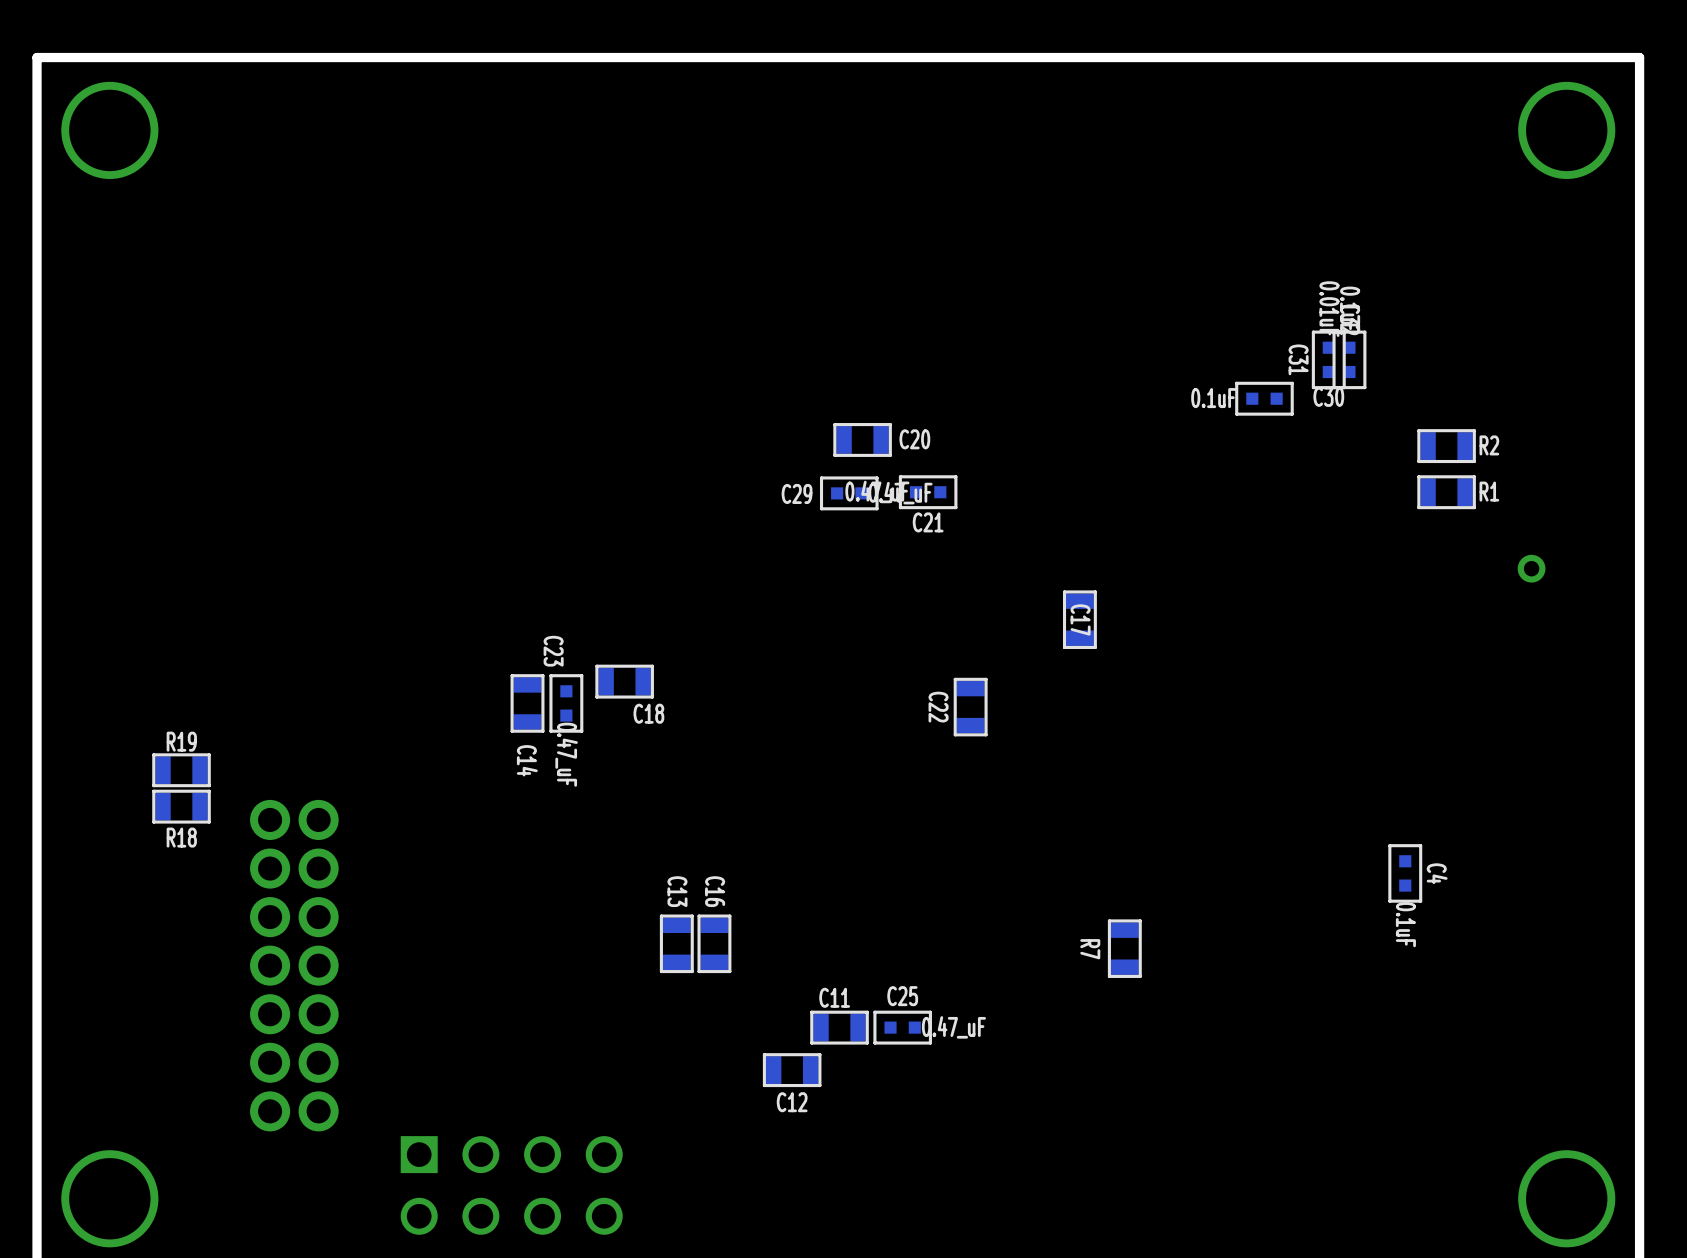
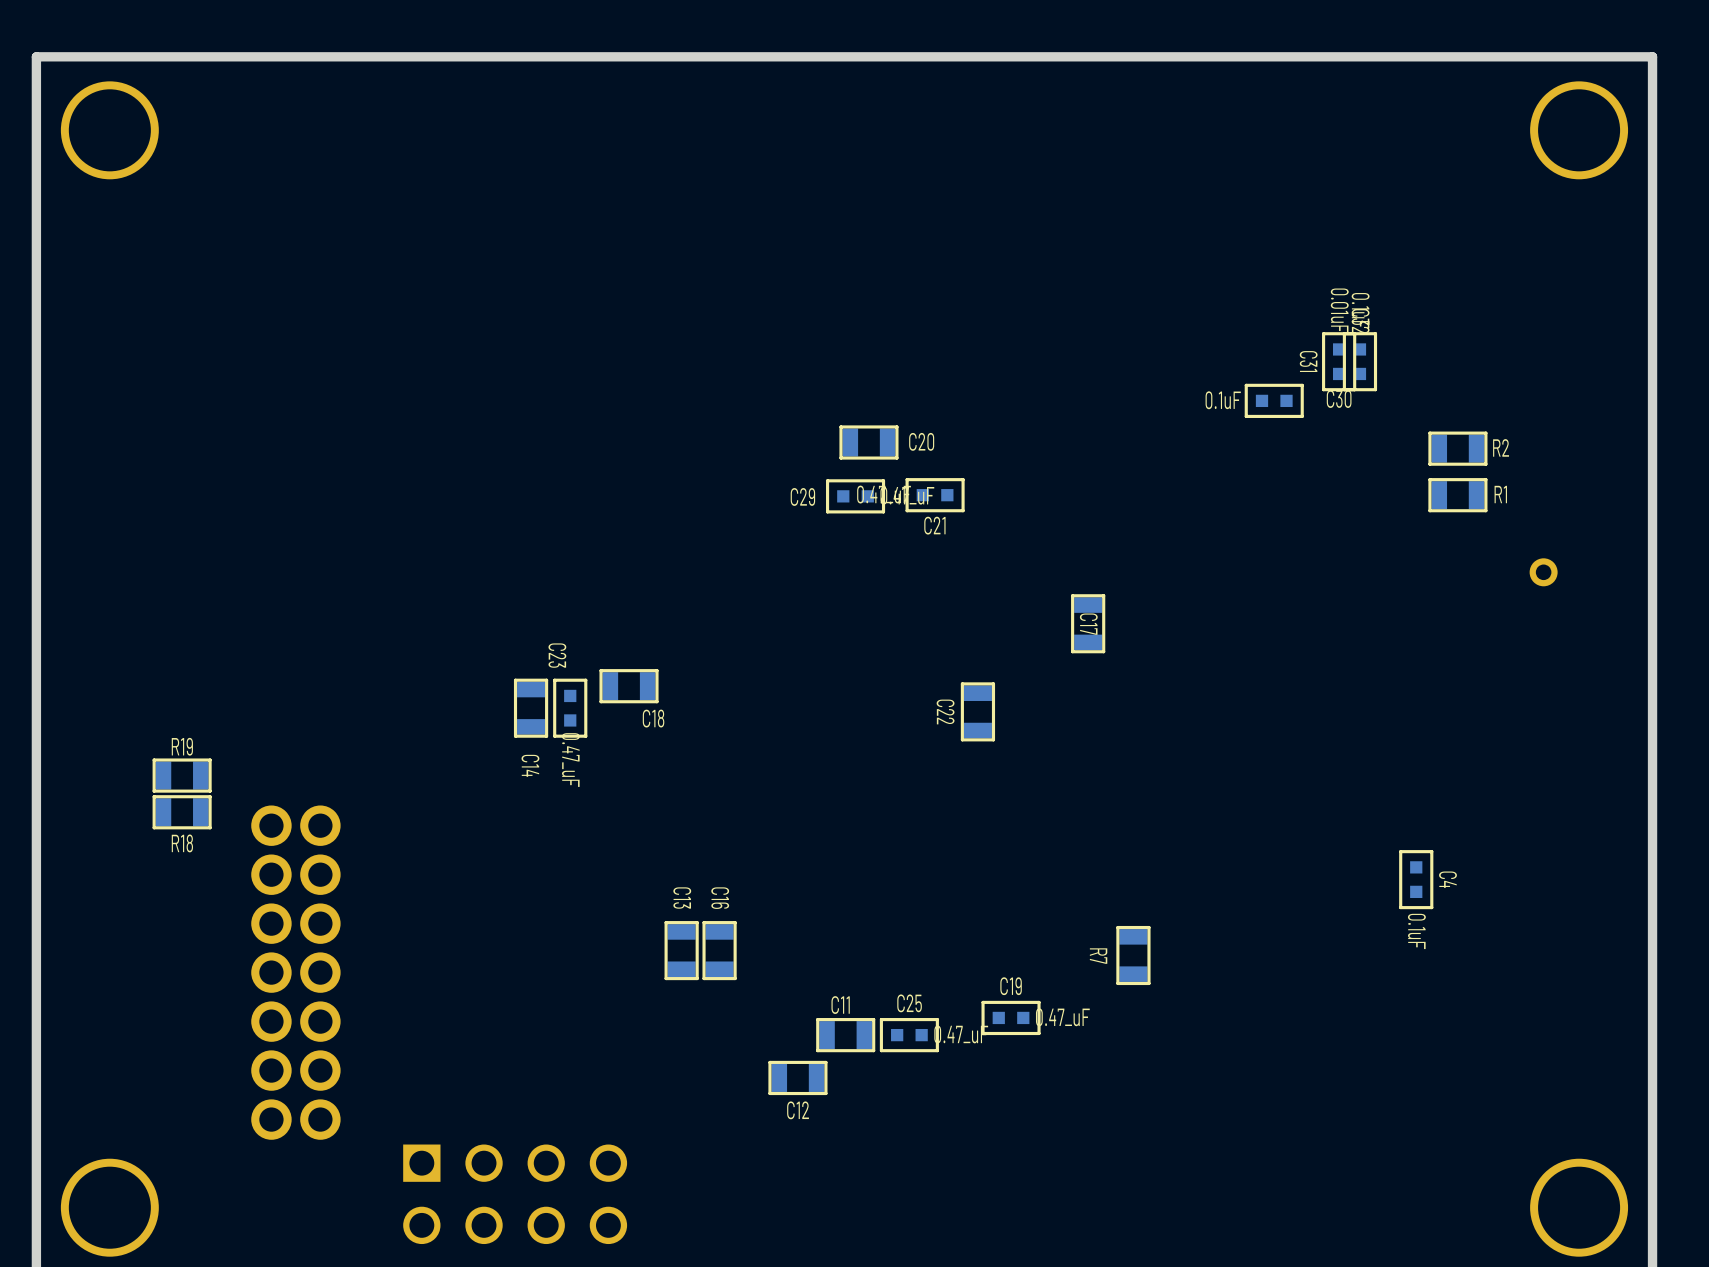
C19: none -> 0.47_uF (1011, 1017)

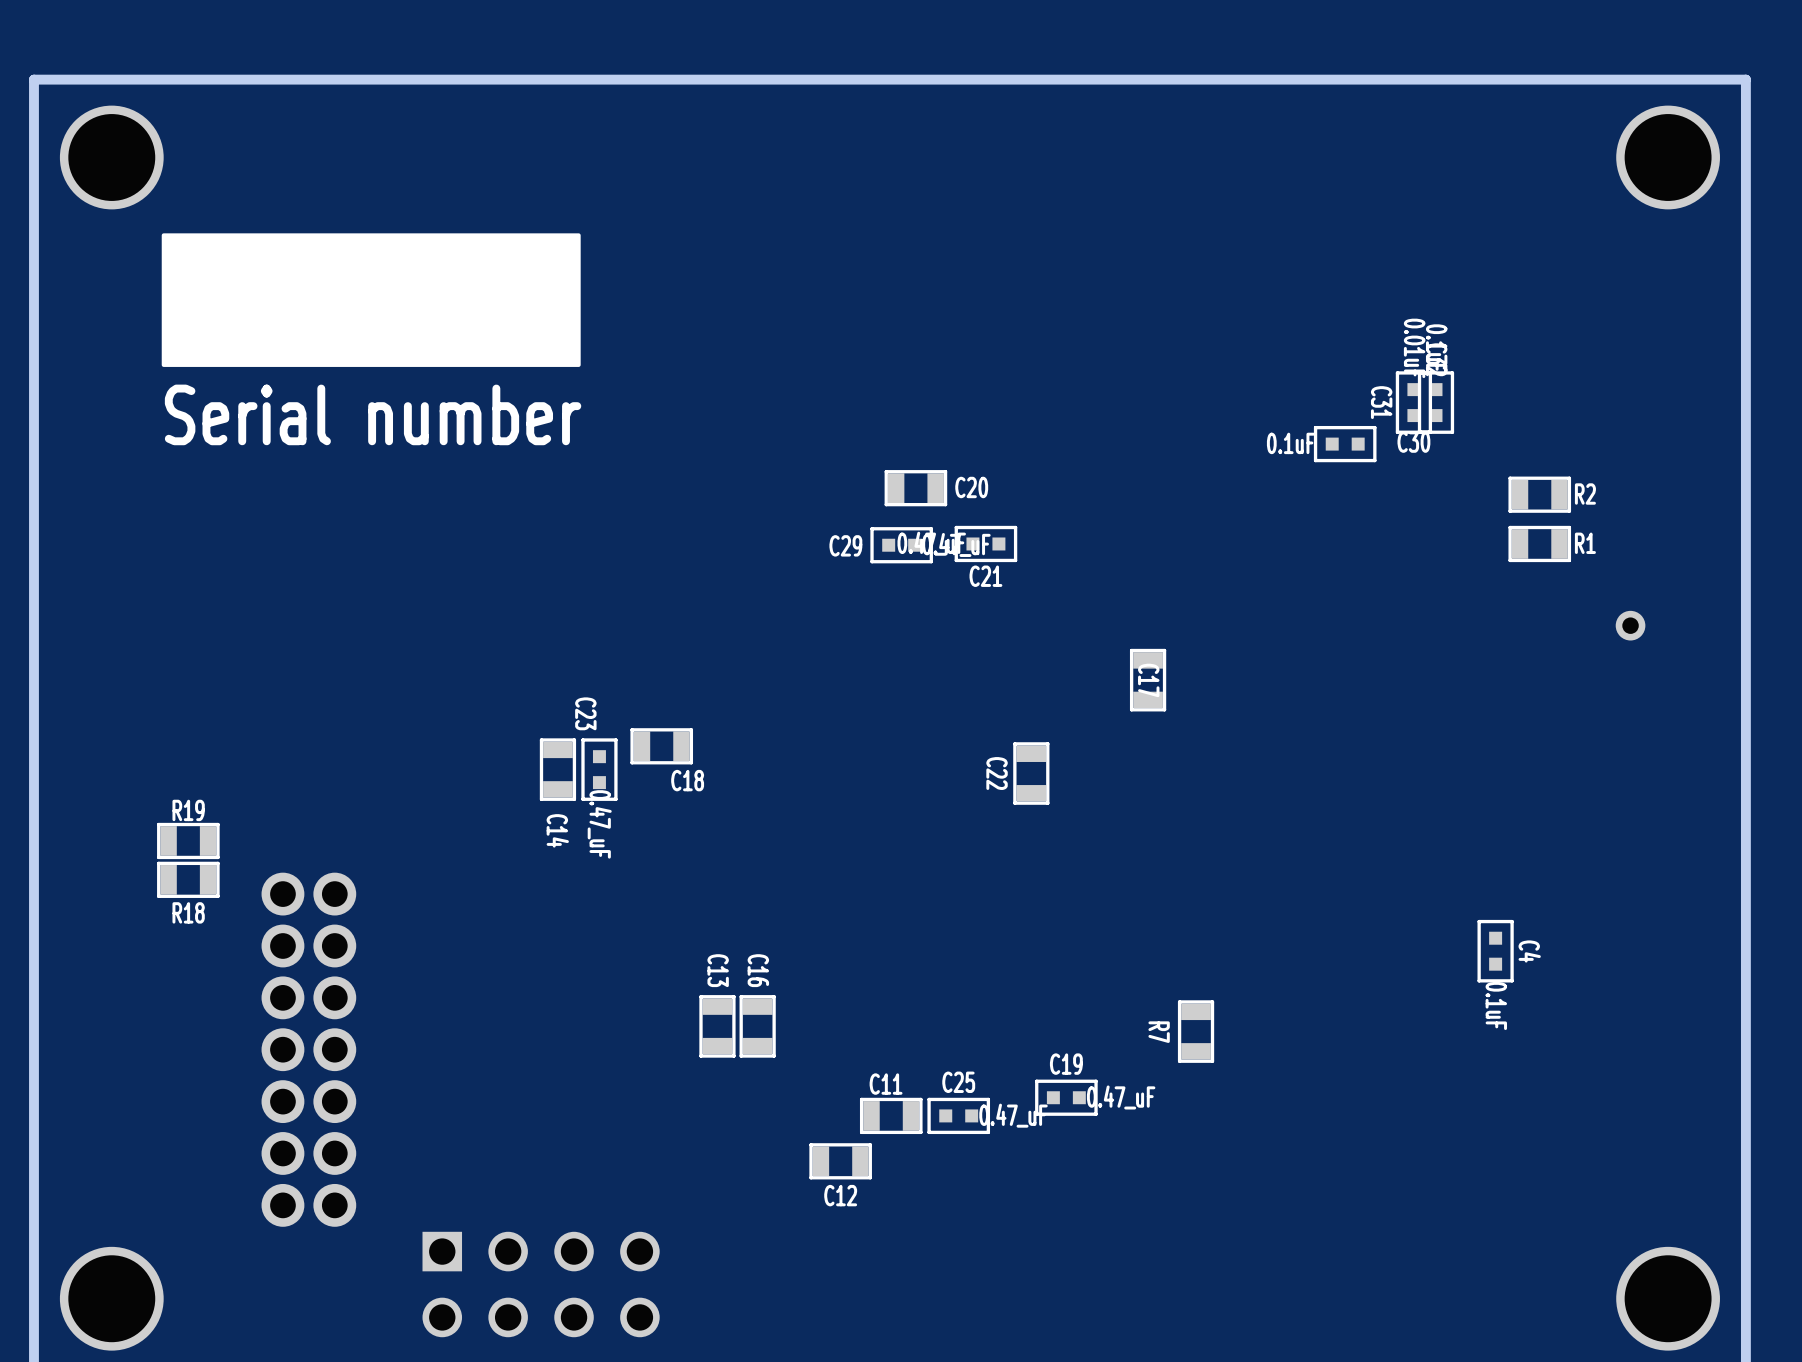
drawing: none -> [161, 233, 581, 367]
text: none -> Serial number (373, 414)

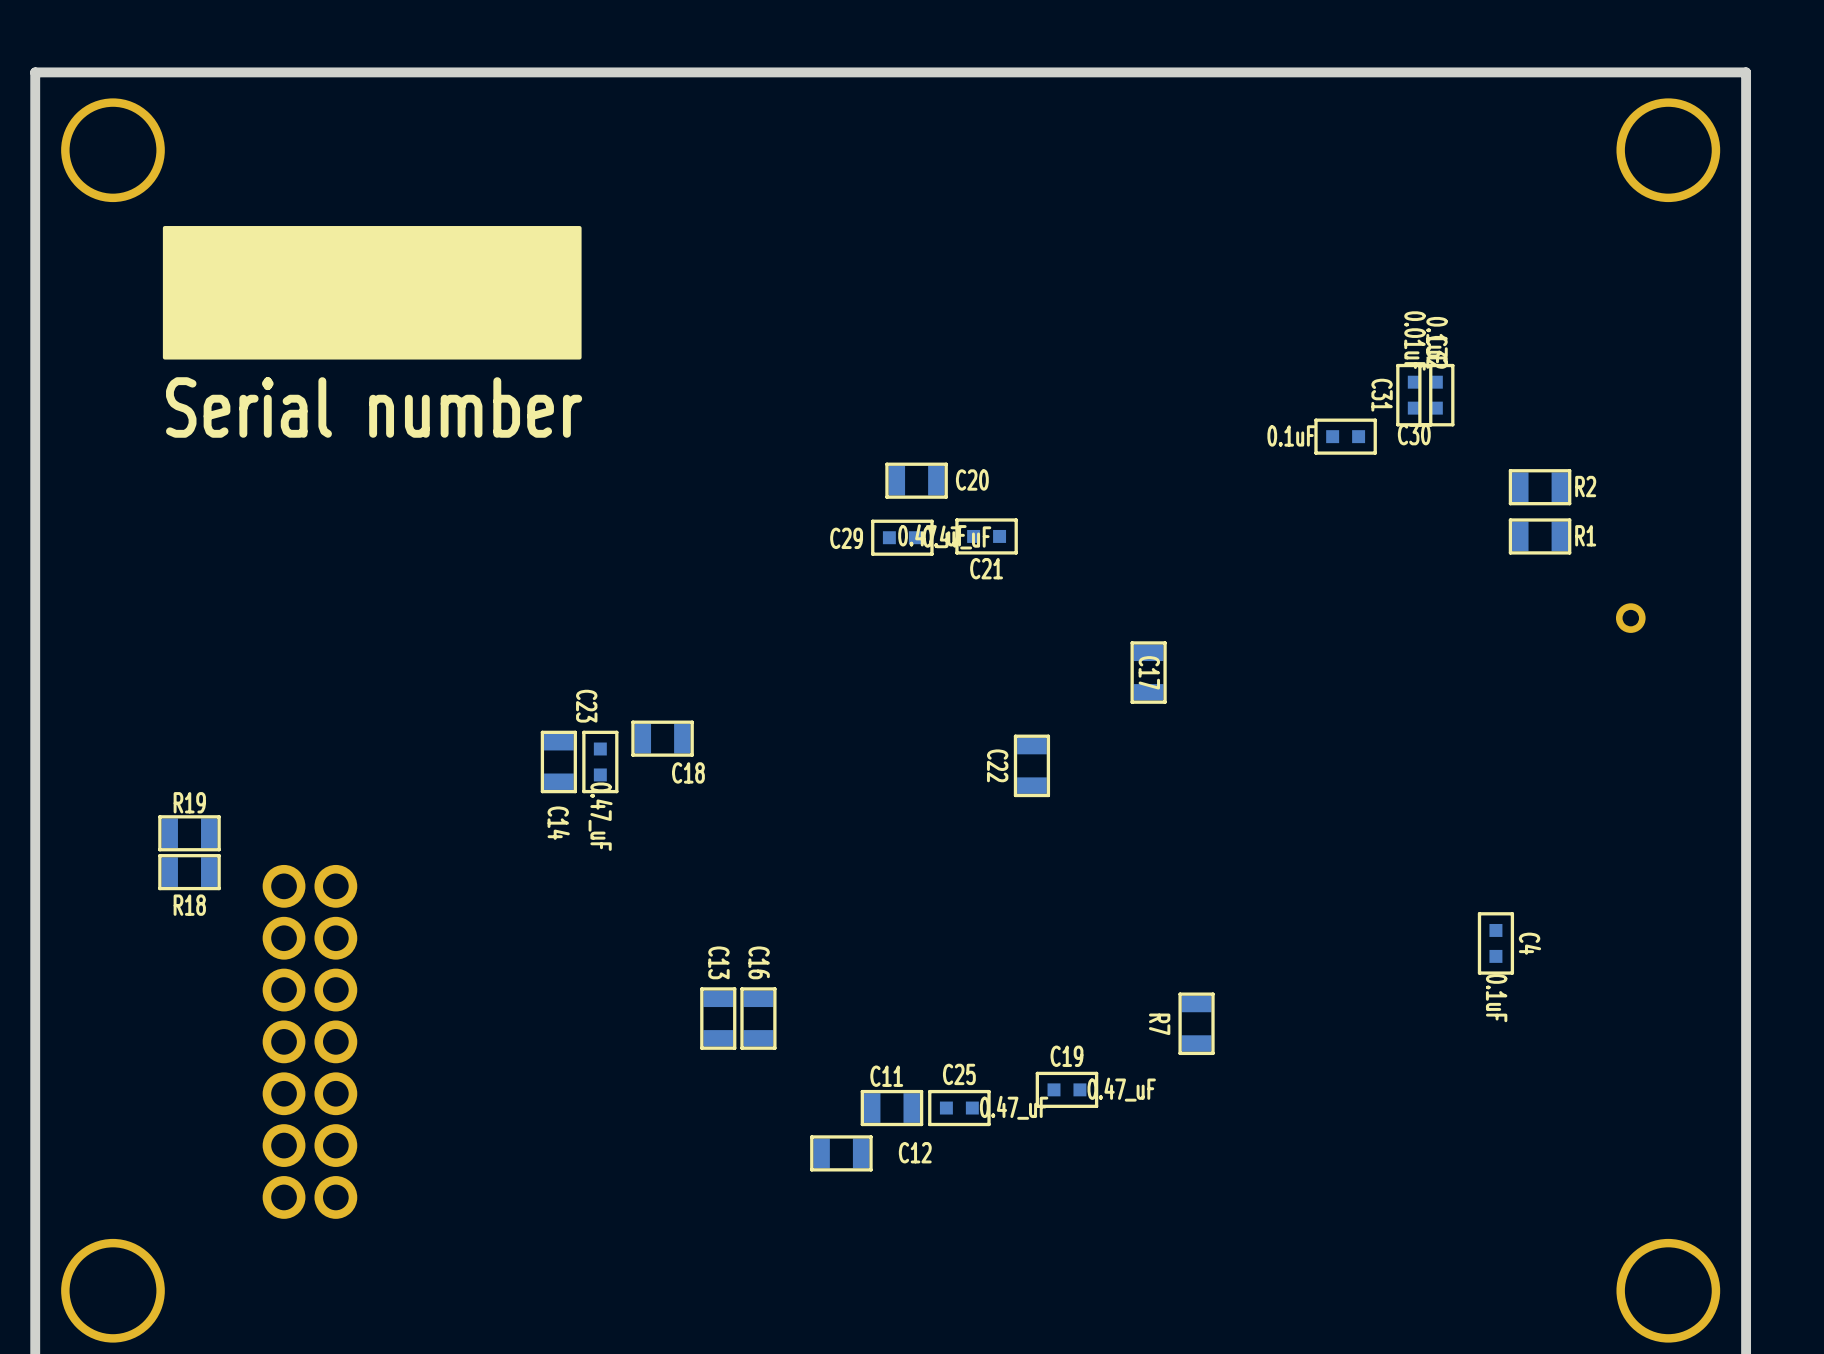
C12 name position: C12 (840, 1195) -> C12 (915, 1152)
part: (541, 1284) -> none

